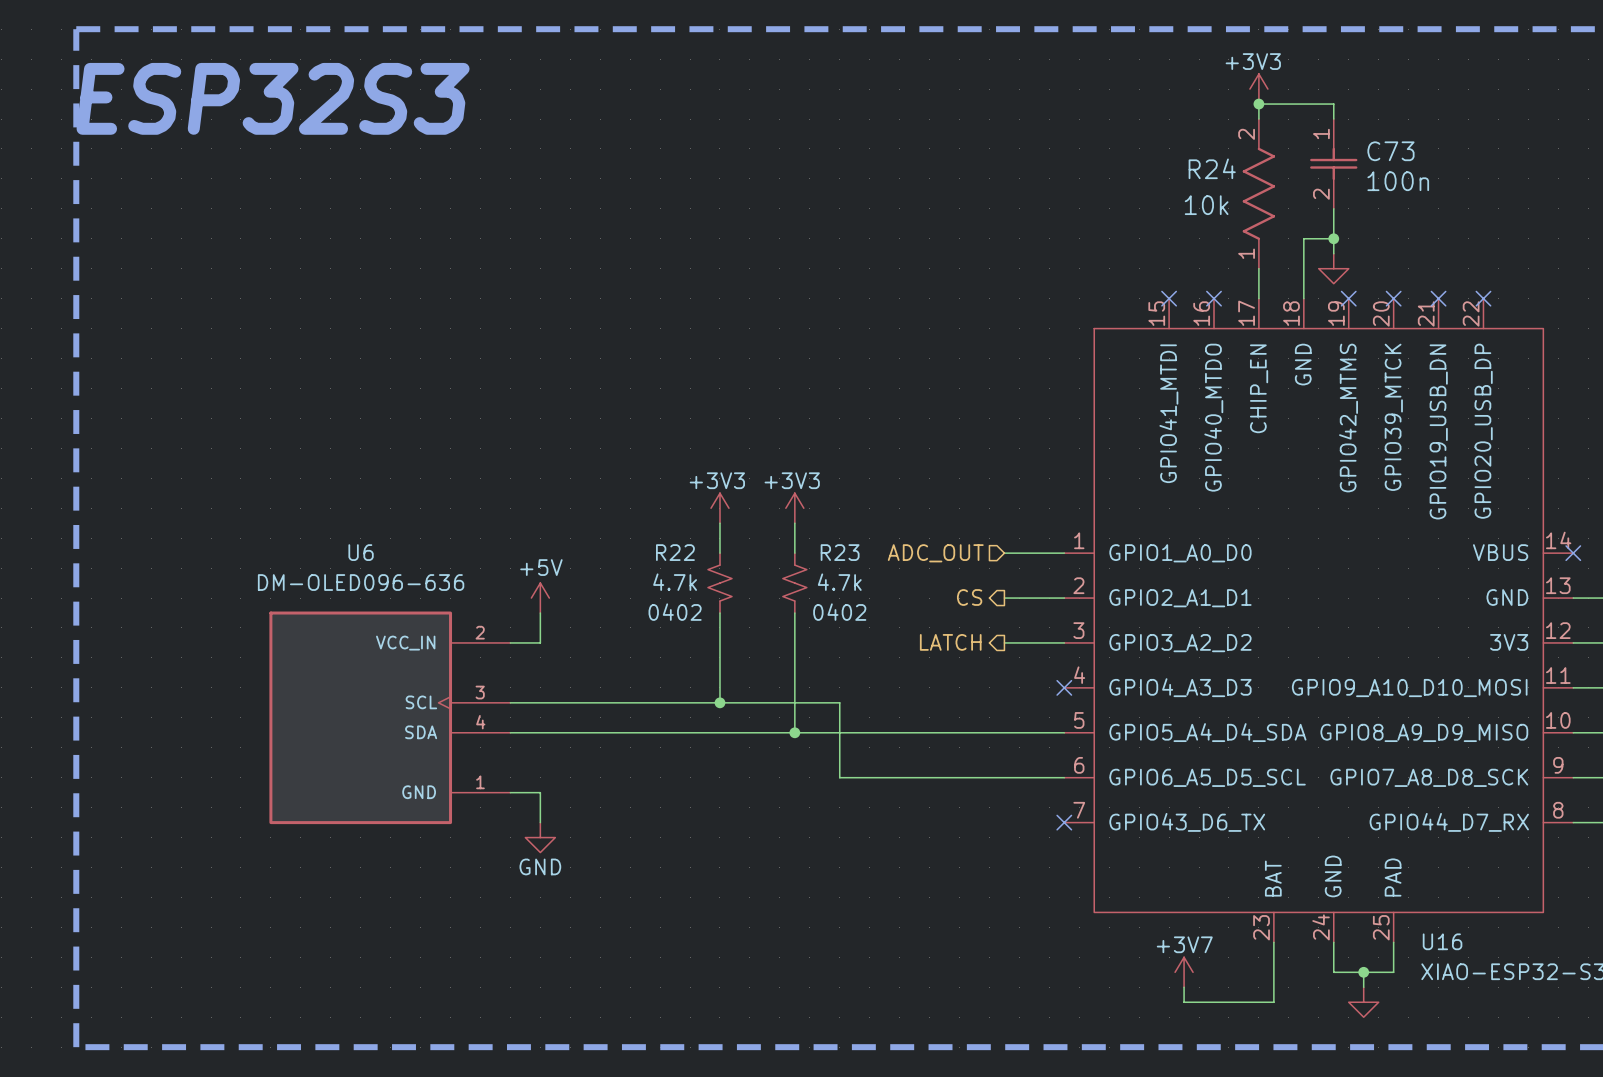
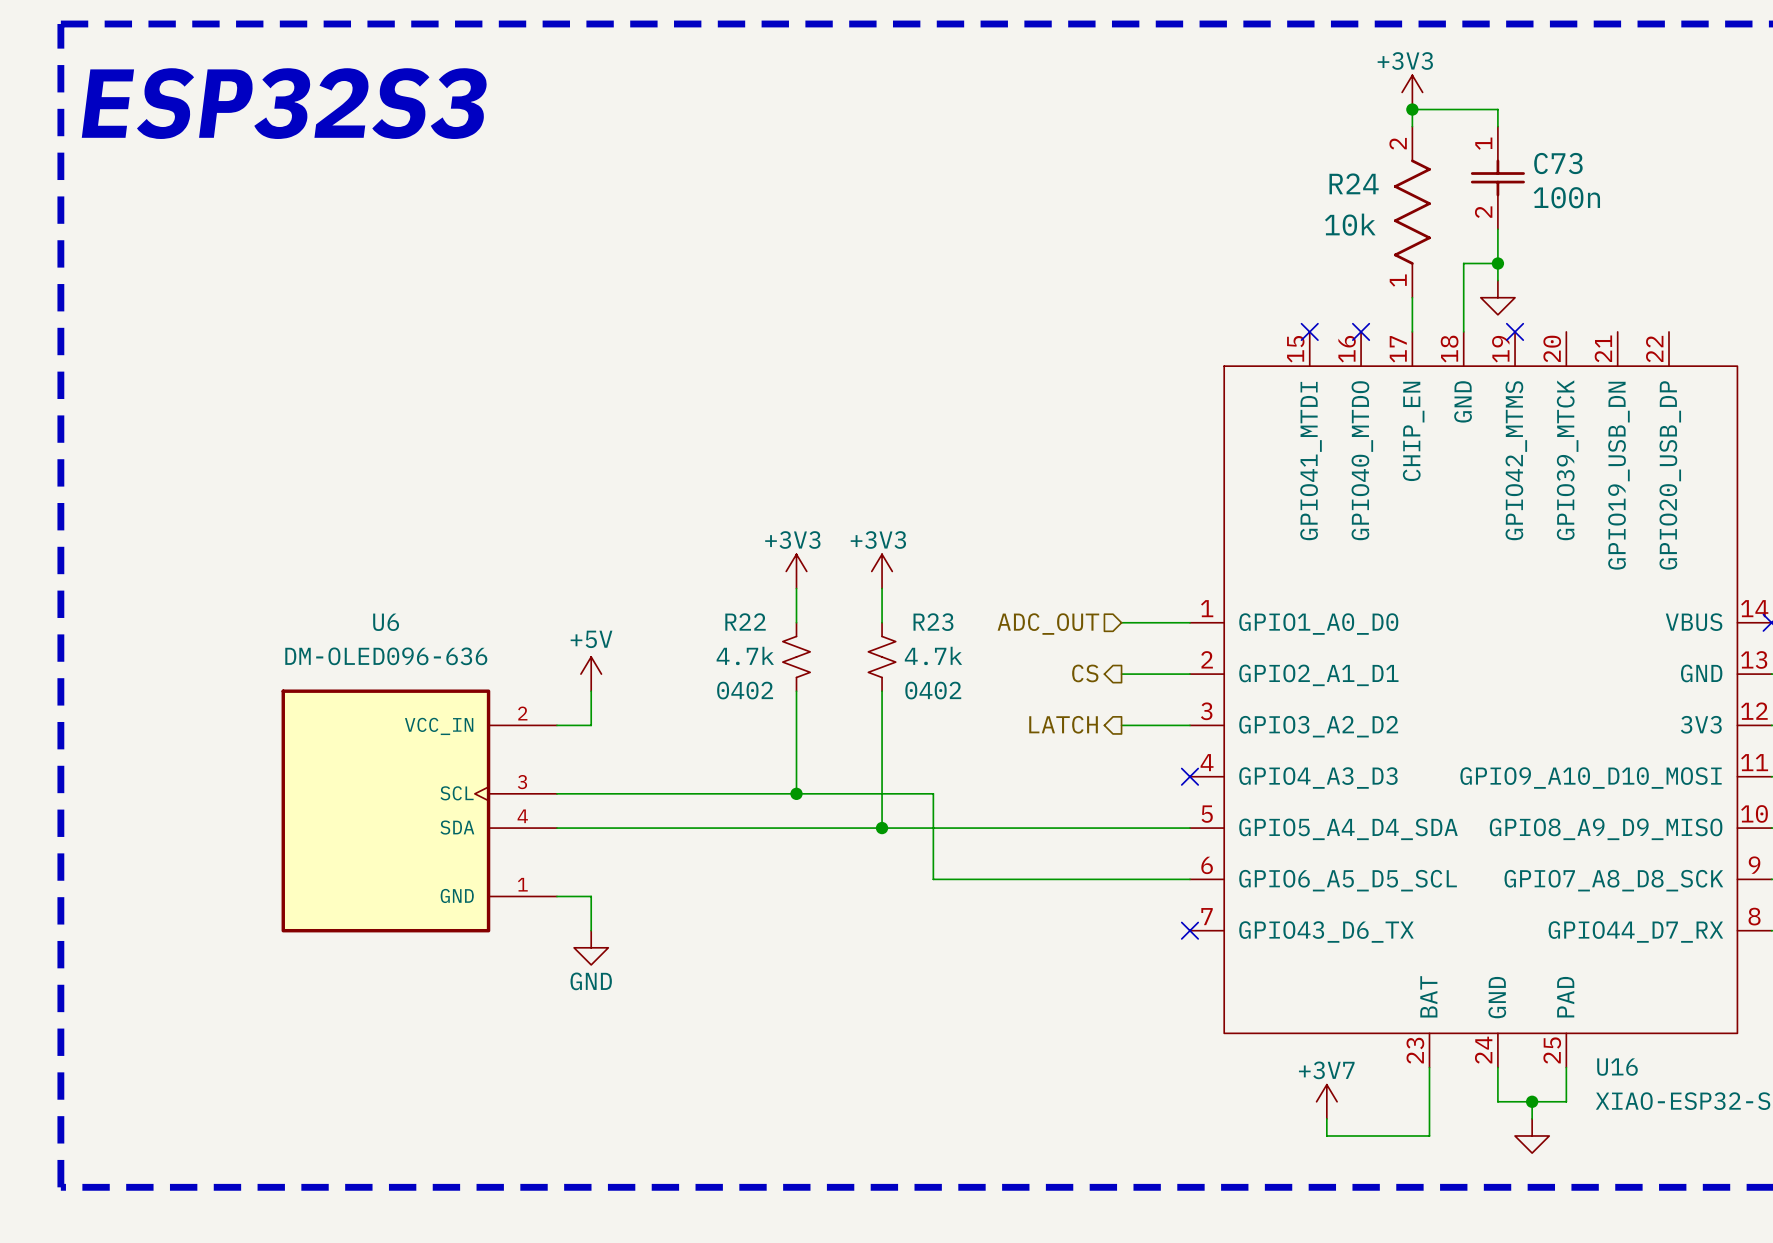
no-connect mark: (1393, 298) -> none
no-connect mark: (1438, 298) -> none
no-connect mark: (1483, 298) -> none

